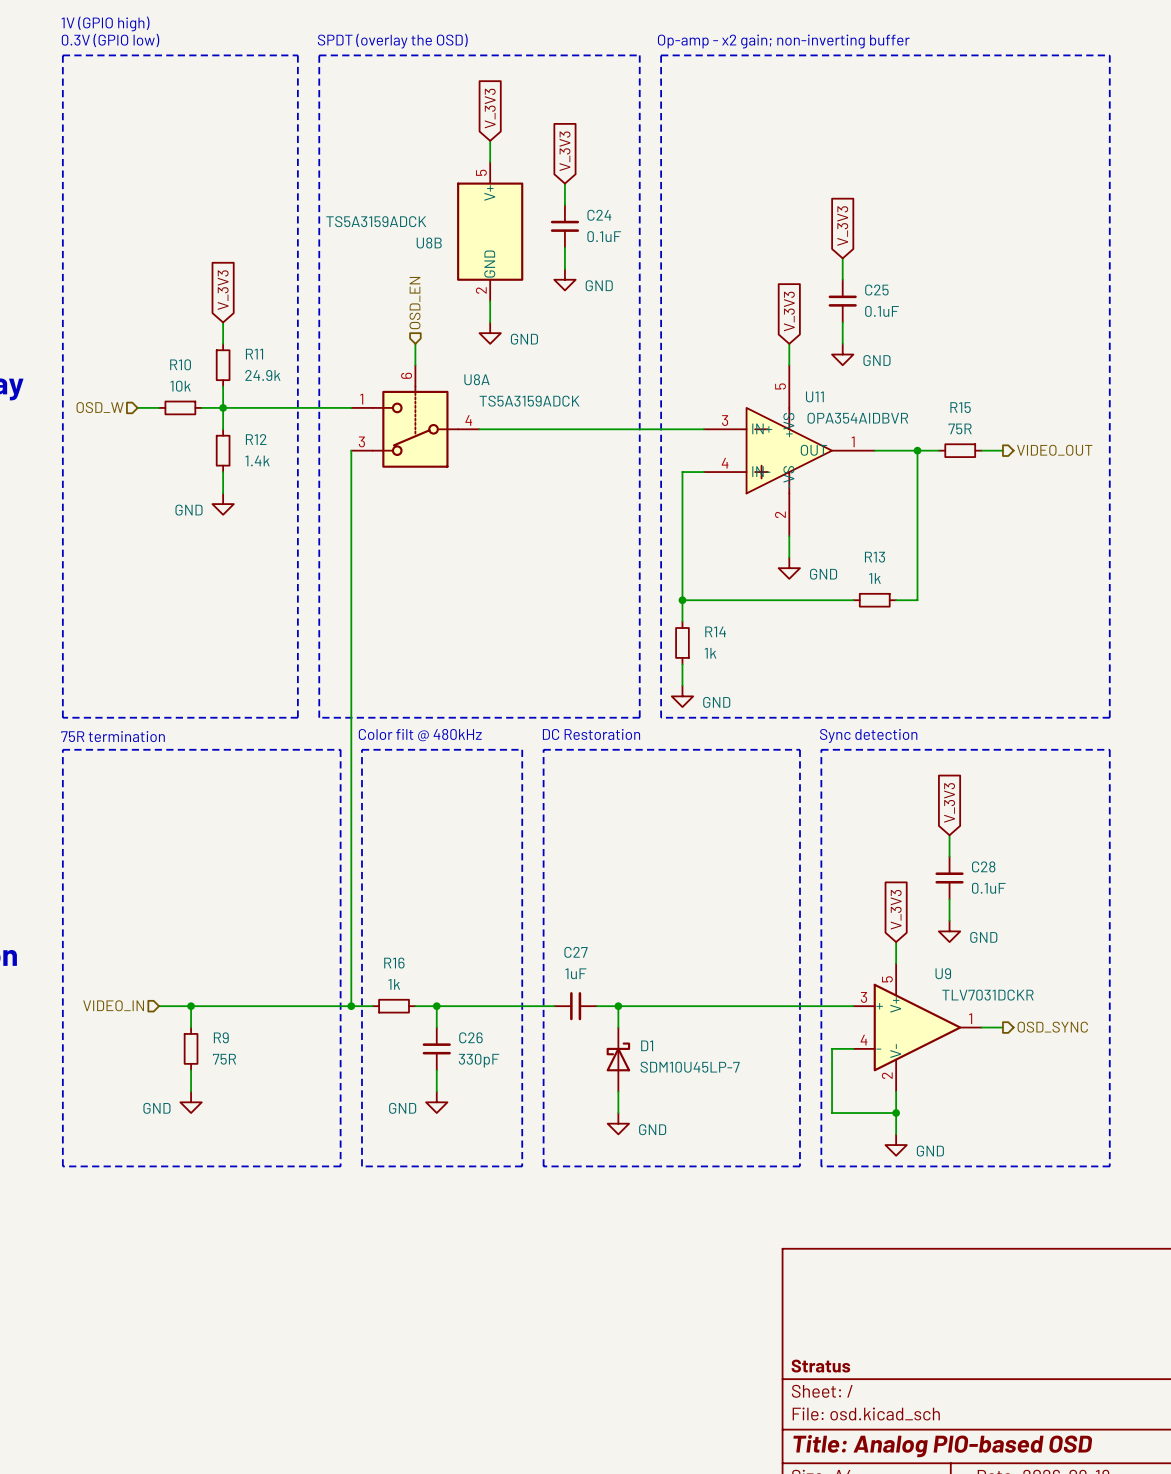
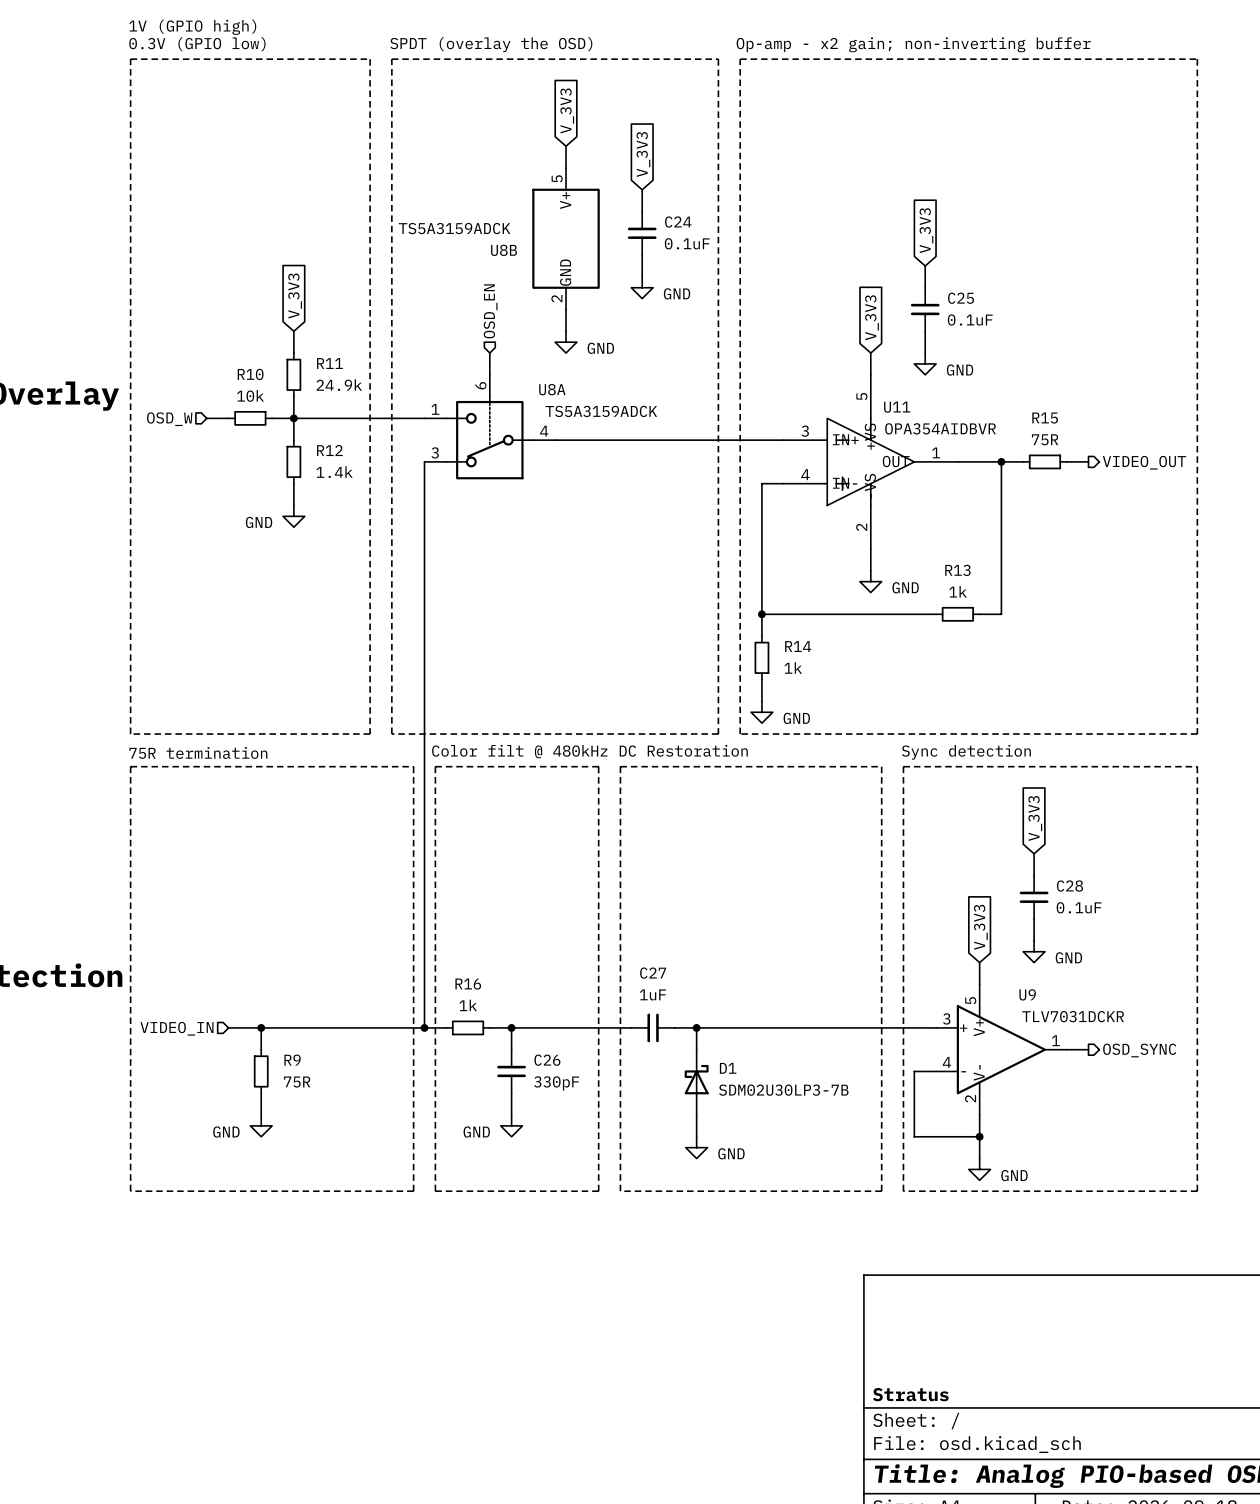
D1 value: SDM10U45LP-7 (690, 1067) -> SDM02U30LP3-7B (783, 1090)

